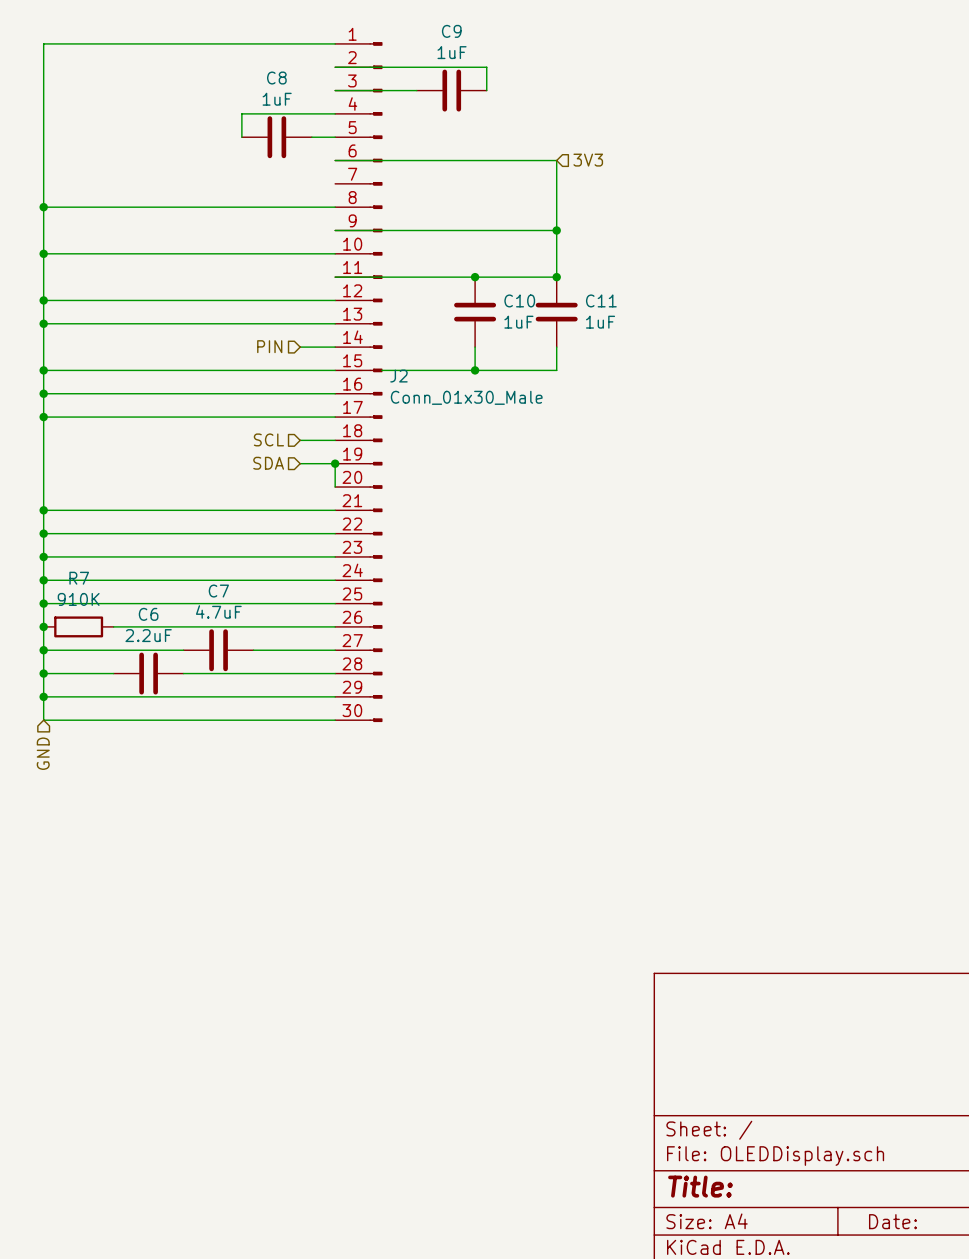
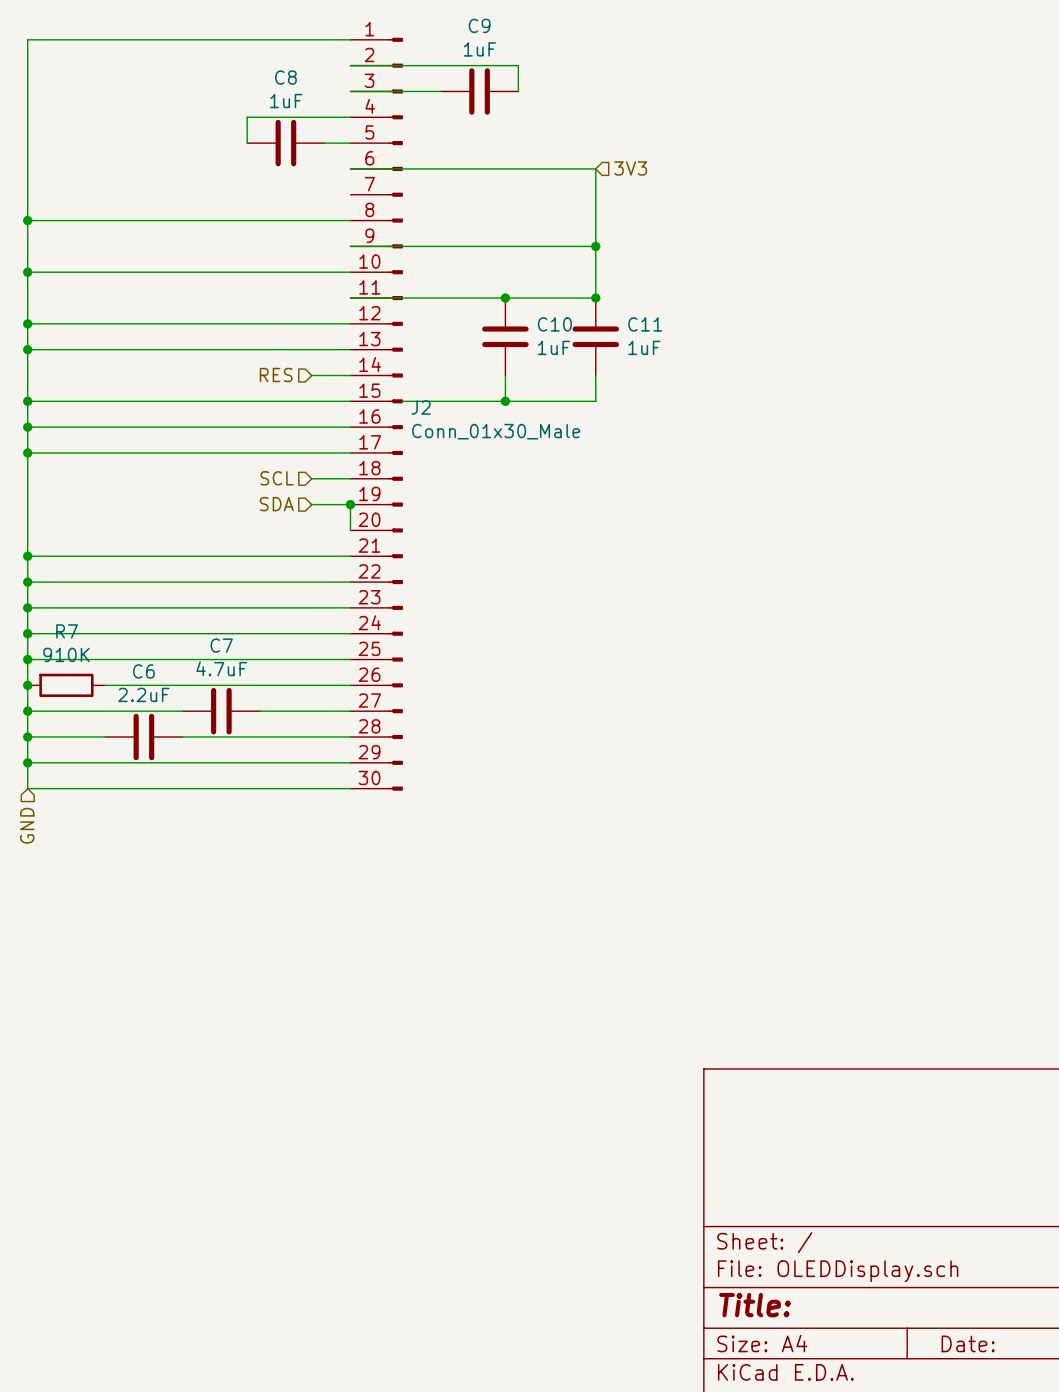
hierarchical label: PIN (269, 346) -> RES (276, 375)

